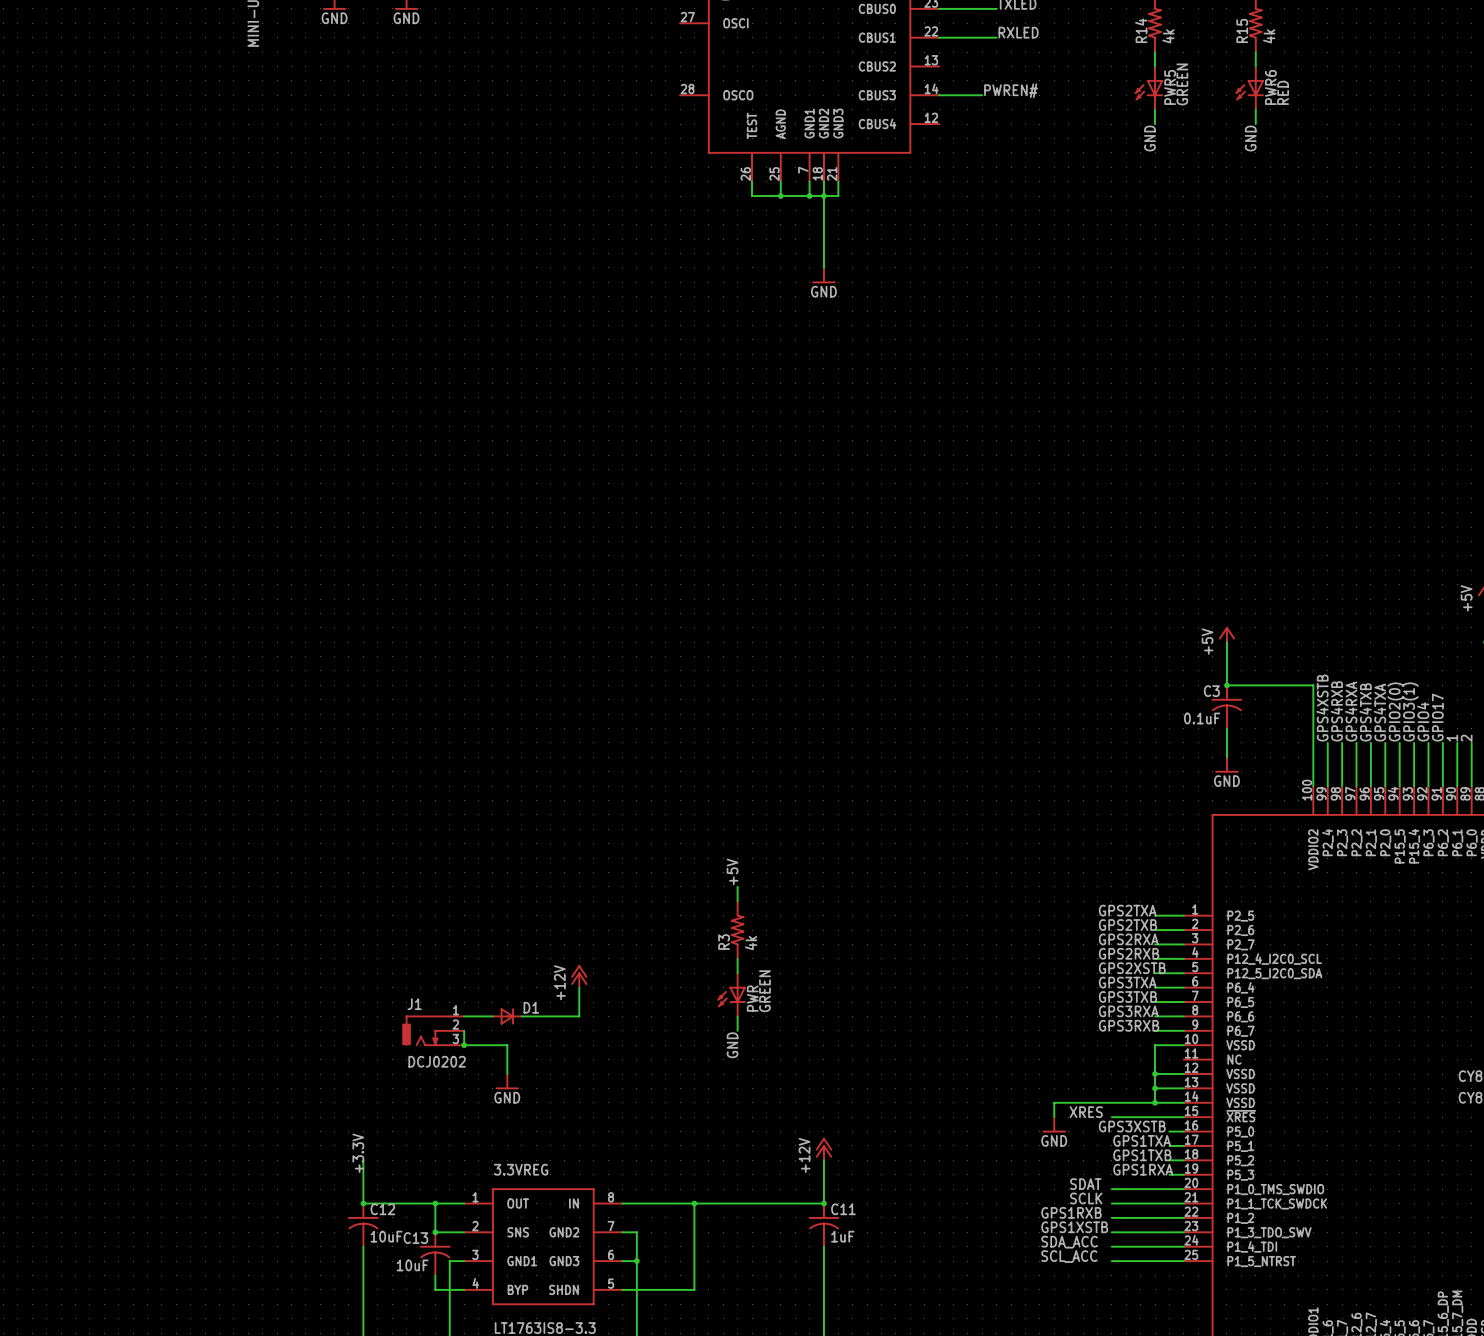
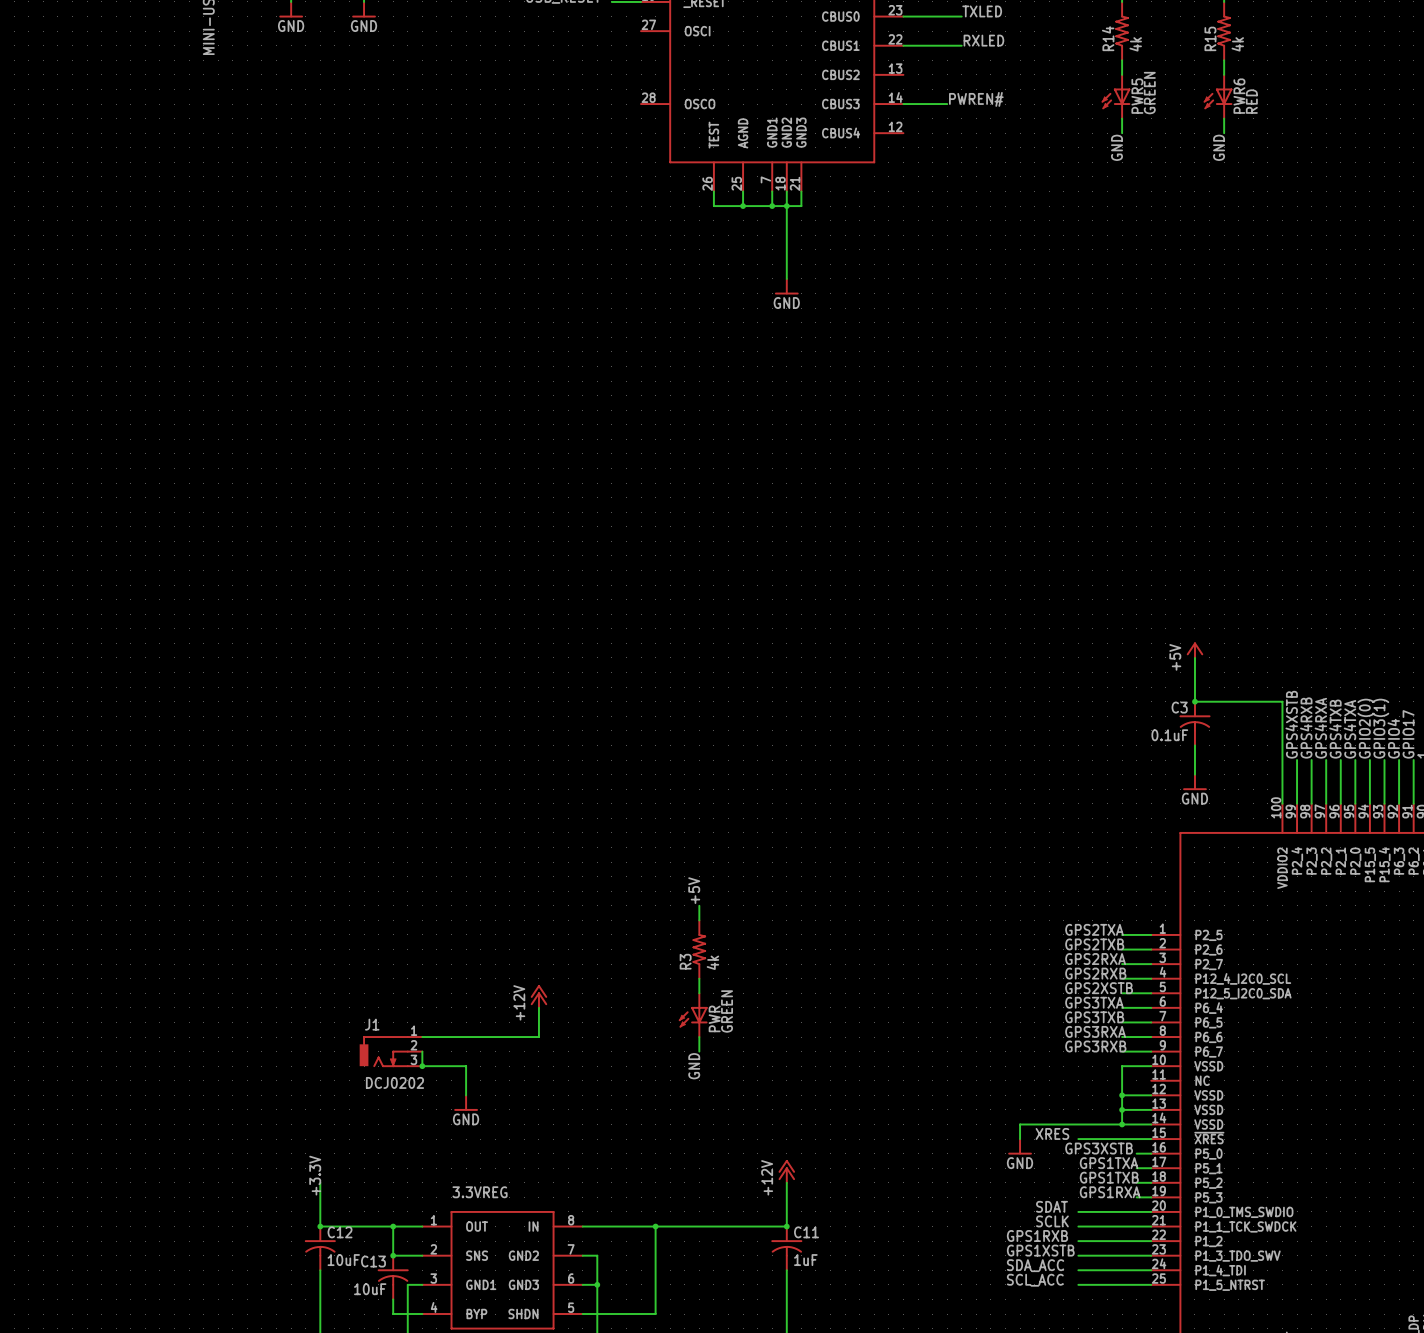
D1: (507, 1016) -> none

